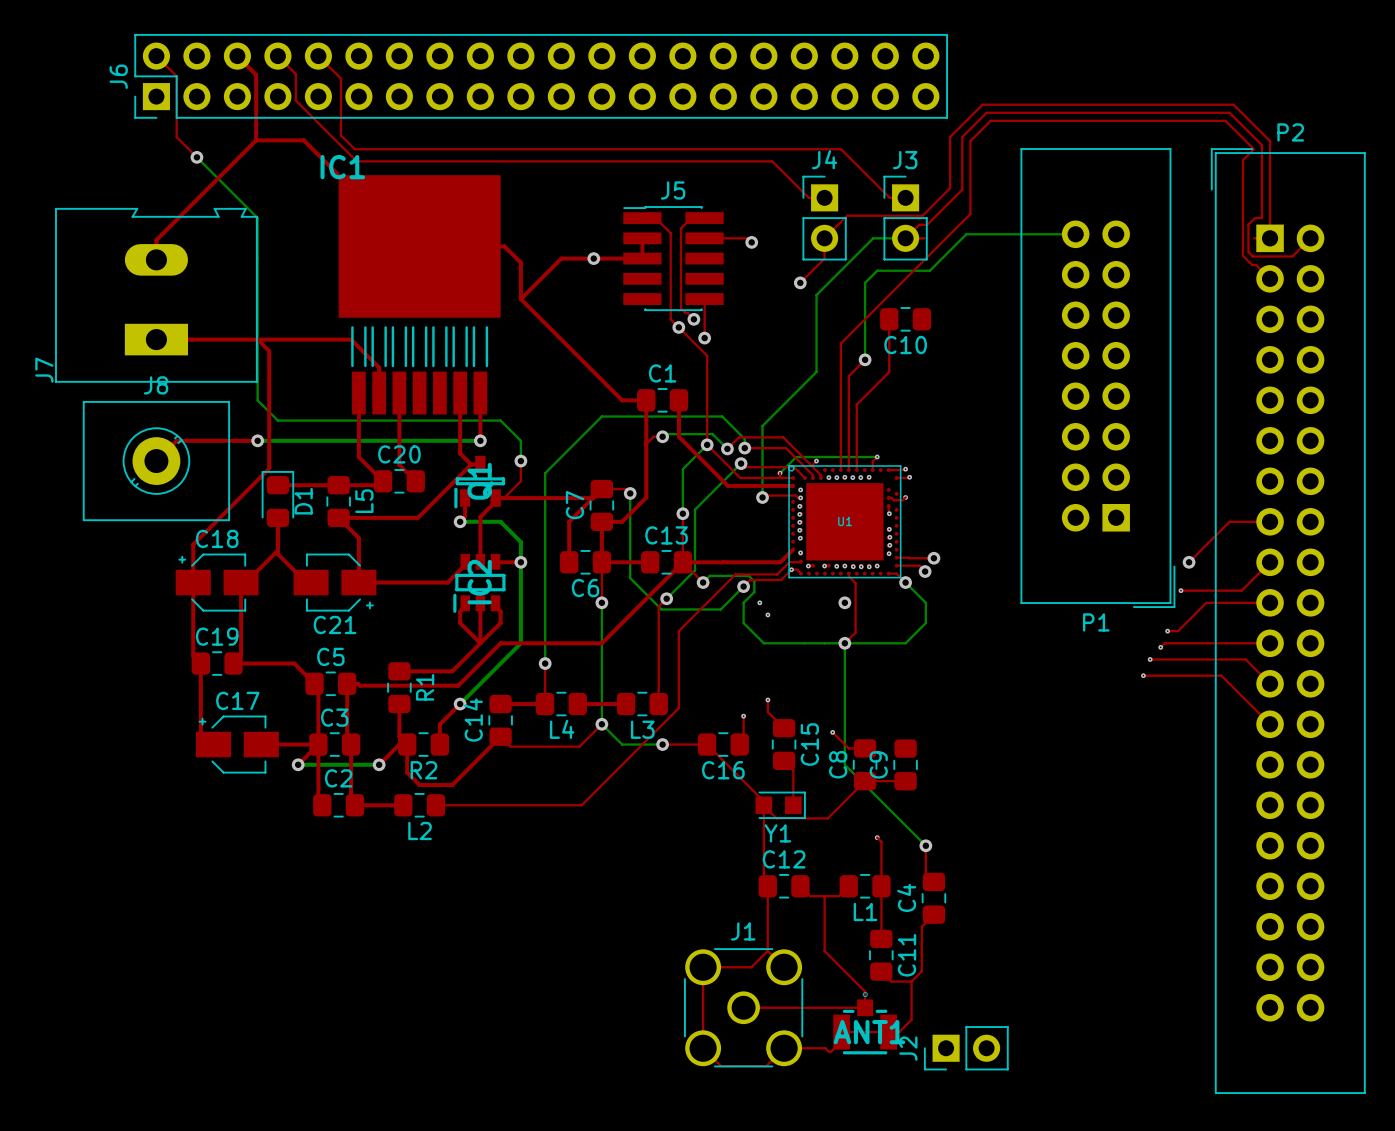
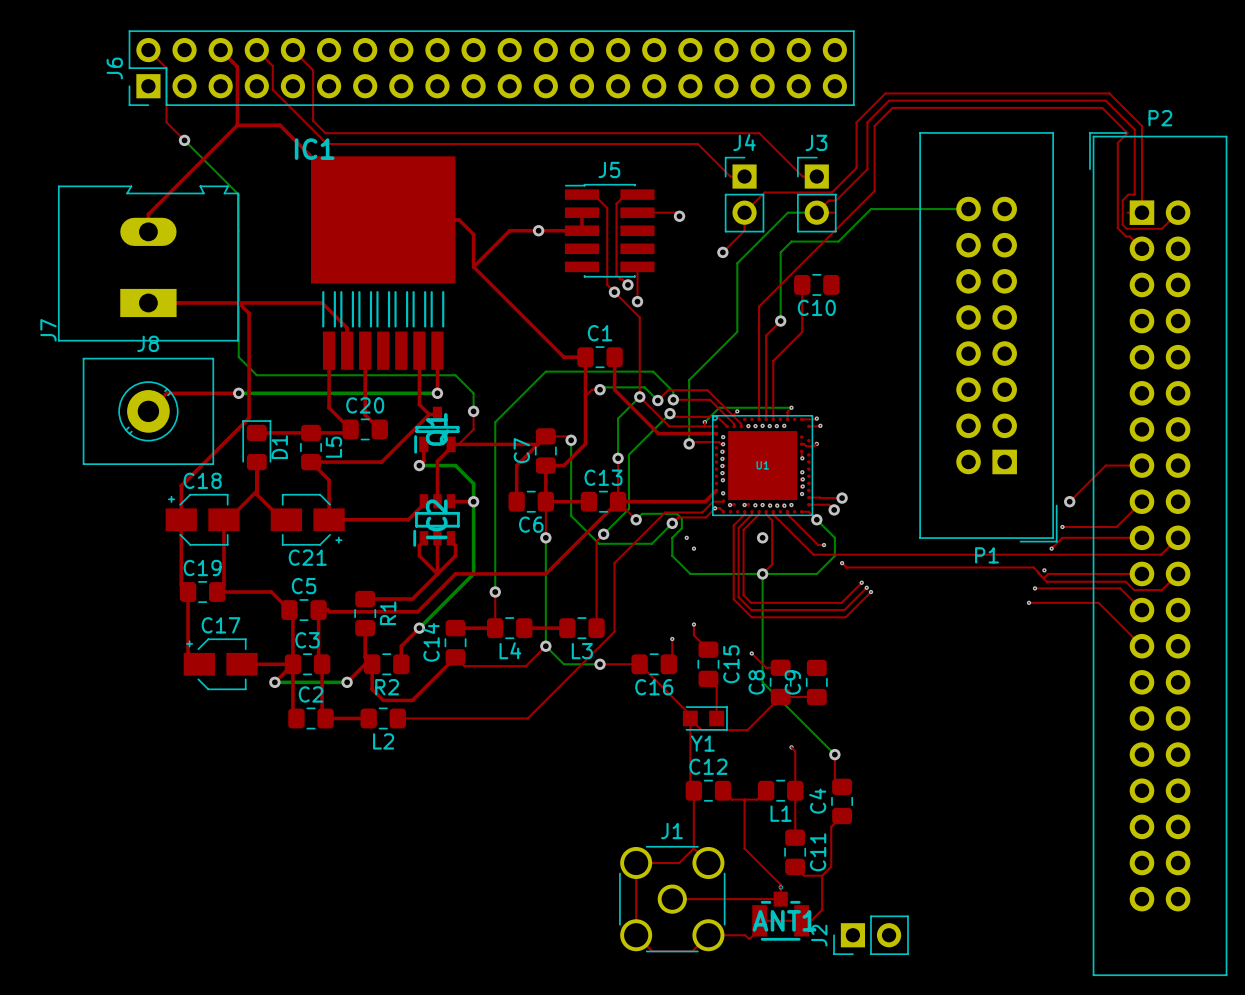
top track: none -> (744, 511) (744, 514) (733, 525) (733, 599) (751, 617) (845, 617) (871, 592)
top track: none -> (751, 511) (751, 514) (738, 527) (738, 597) (751, 610) (844, 610) (866, 587)
top track: none -> (759, 511) (759, 514) (743, 529) (743, 595) (751, 602) (841, 602) (861, 582)
top track: none -> (773, 511) (773, 514) (813, 554) (1161, 554) (1178, 537)
top track: none -> (787, 511) (787, 514) (818, 545) (824, 545)
top track: (1206, 602) (1178, 631) (1167, 631) -> (1085, 537) (1062, 537) (1051, 548)
via: none -> (824, 545)
via: none -> (1051, 548)
top track: none -> (842, 563) (846, 567) (1033, 567) (1046, 581) (1125, 581) (1134, 590) (1161, 590) (1178, 573)
via: none -> (842, 563)
via: (1167, 631) -> none
via: none -> (1044, 570)
via: (1160, 647) -> none
via: none -> (861, 582)
via: none -> (866, 587)
via: none -> (871, 592)

